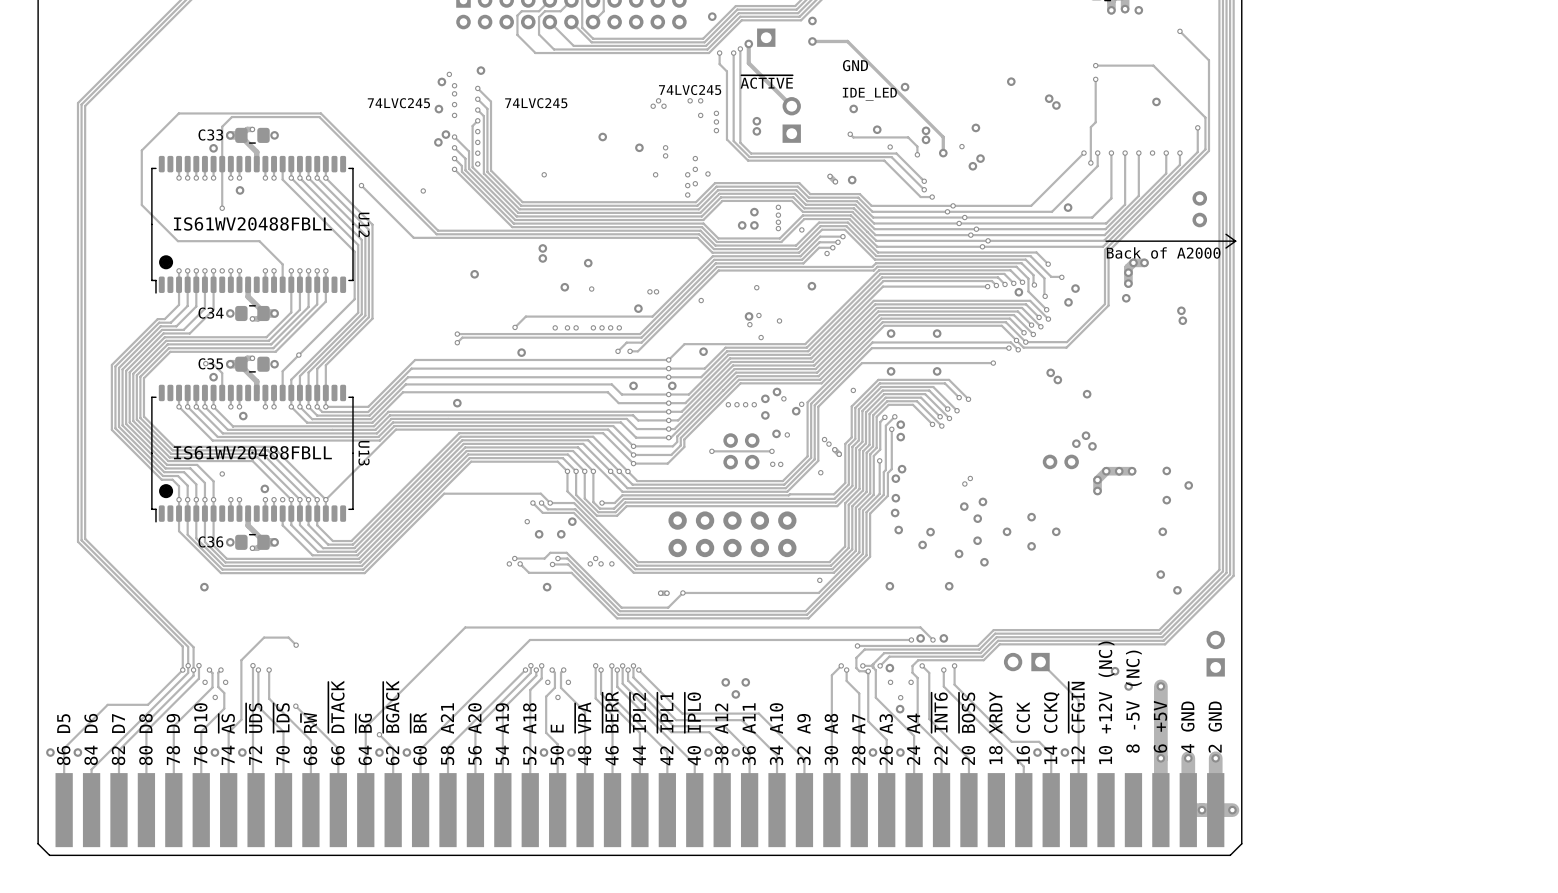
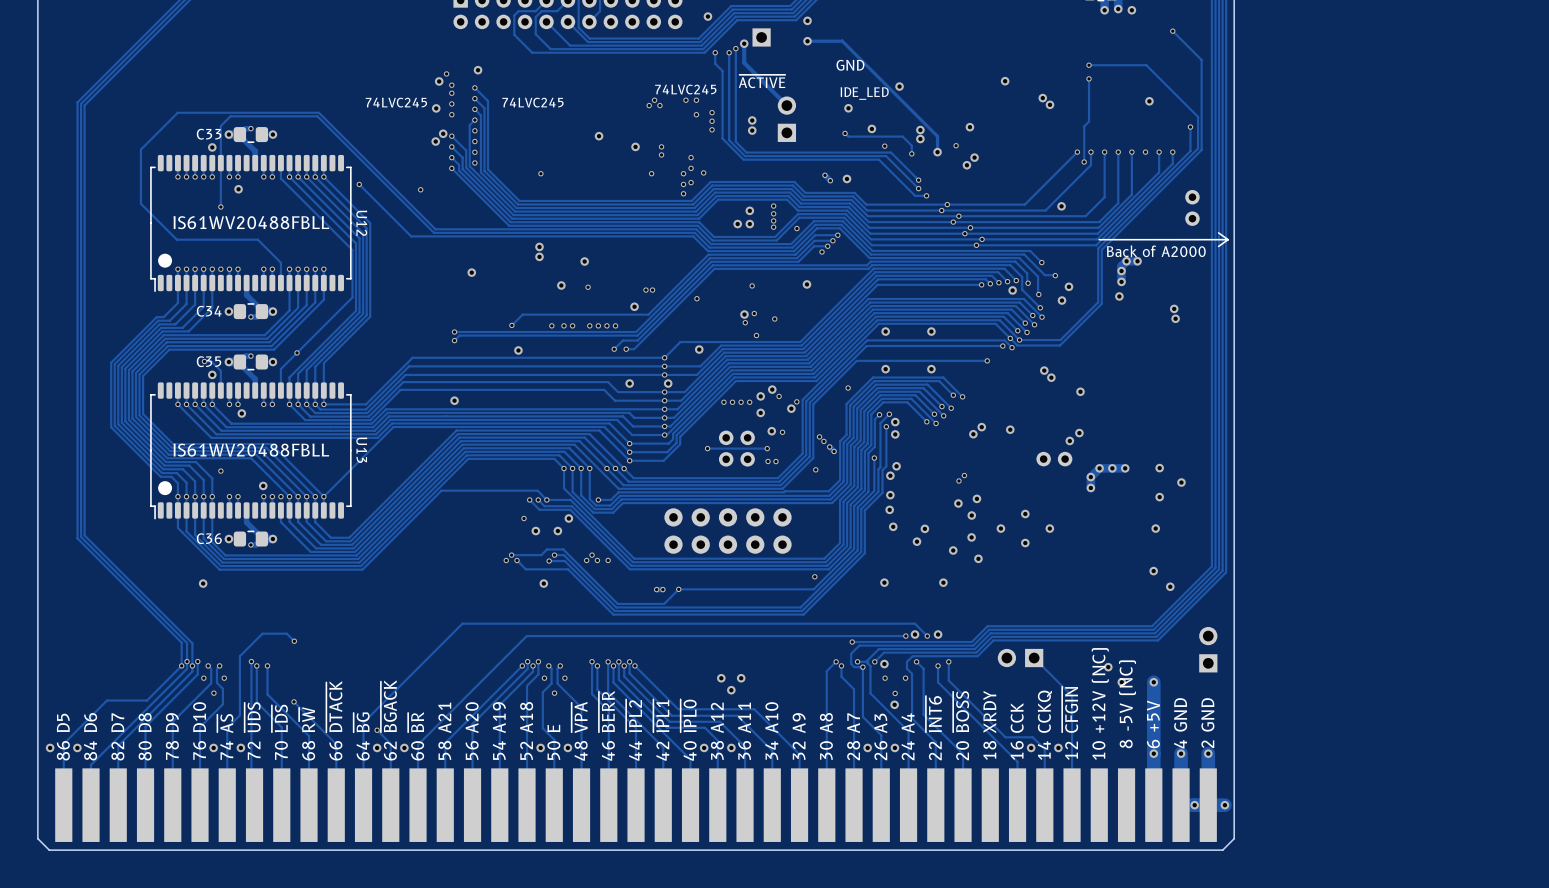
via: none -> (981, 427)
via: none -> (1010, 429)
via: none -> (973, 434)
via: (1092, 446) -> none

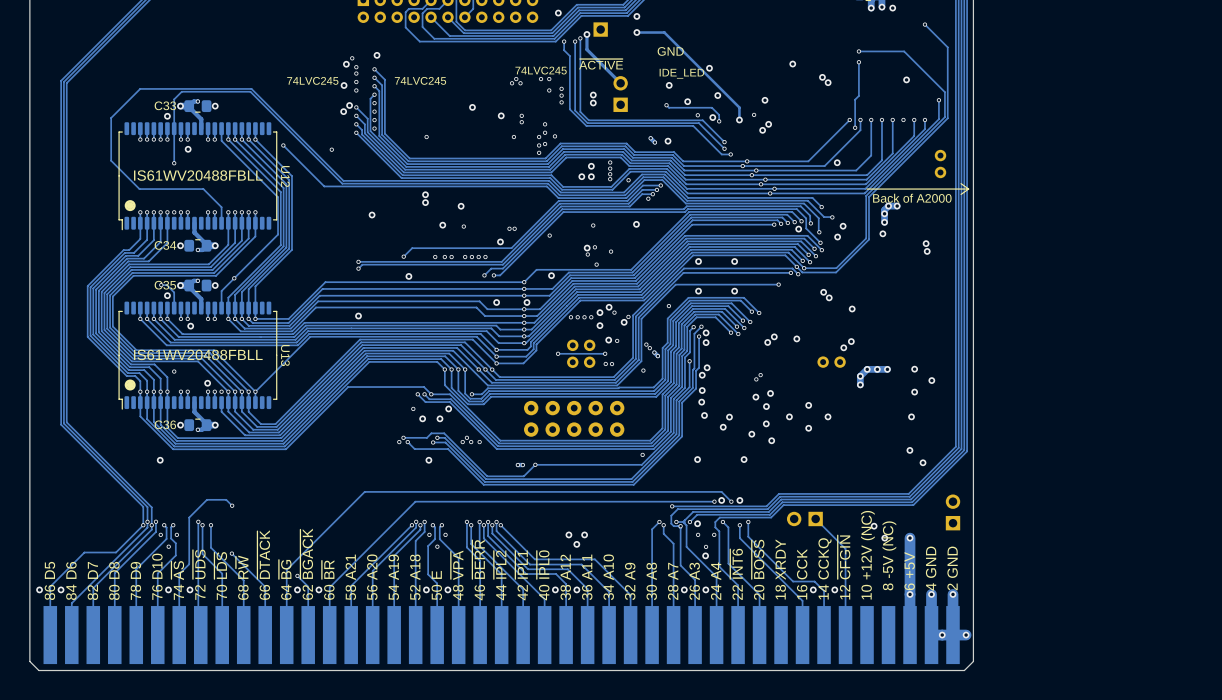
via: none -> (717, 95)
via: (920, 130) -> none
via: (920, 139) -> none
via: none -> (712, 117)

